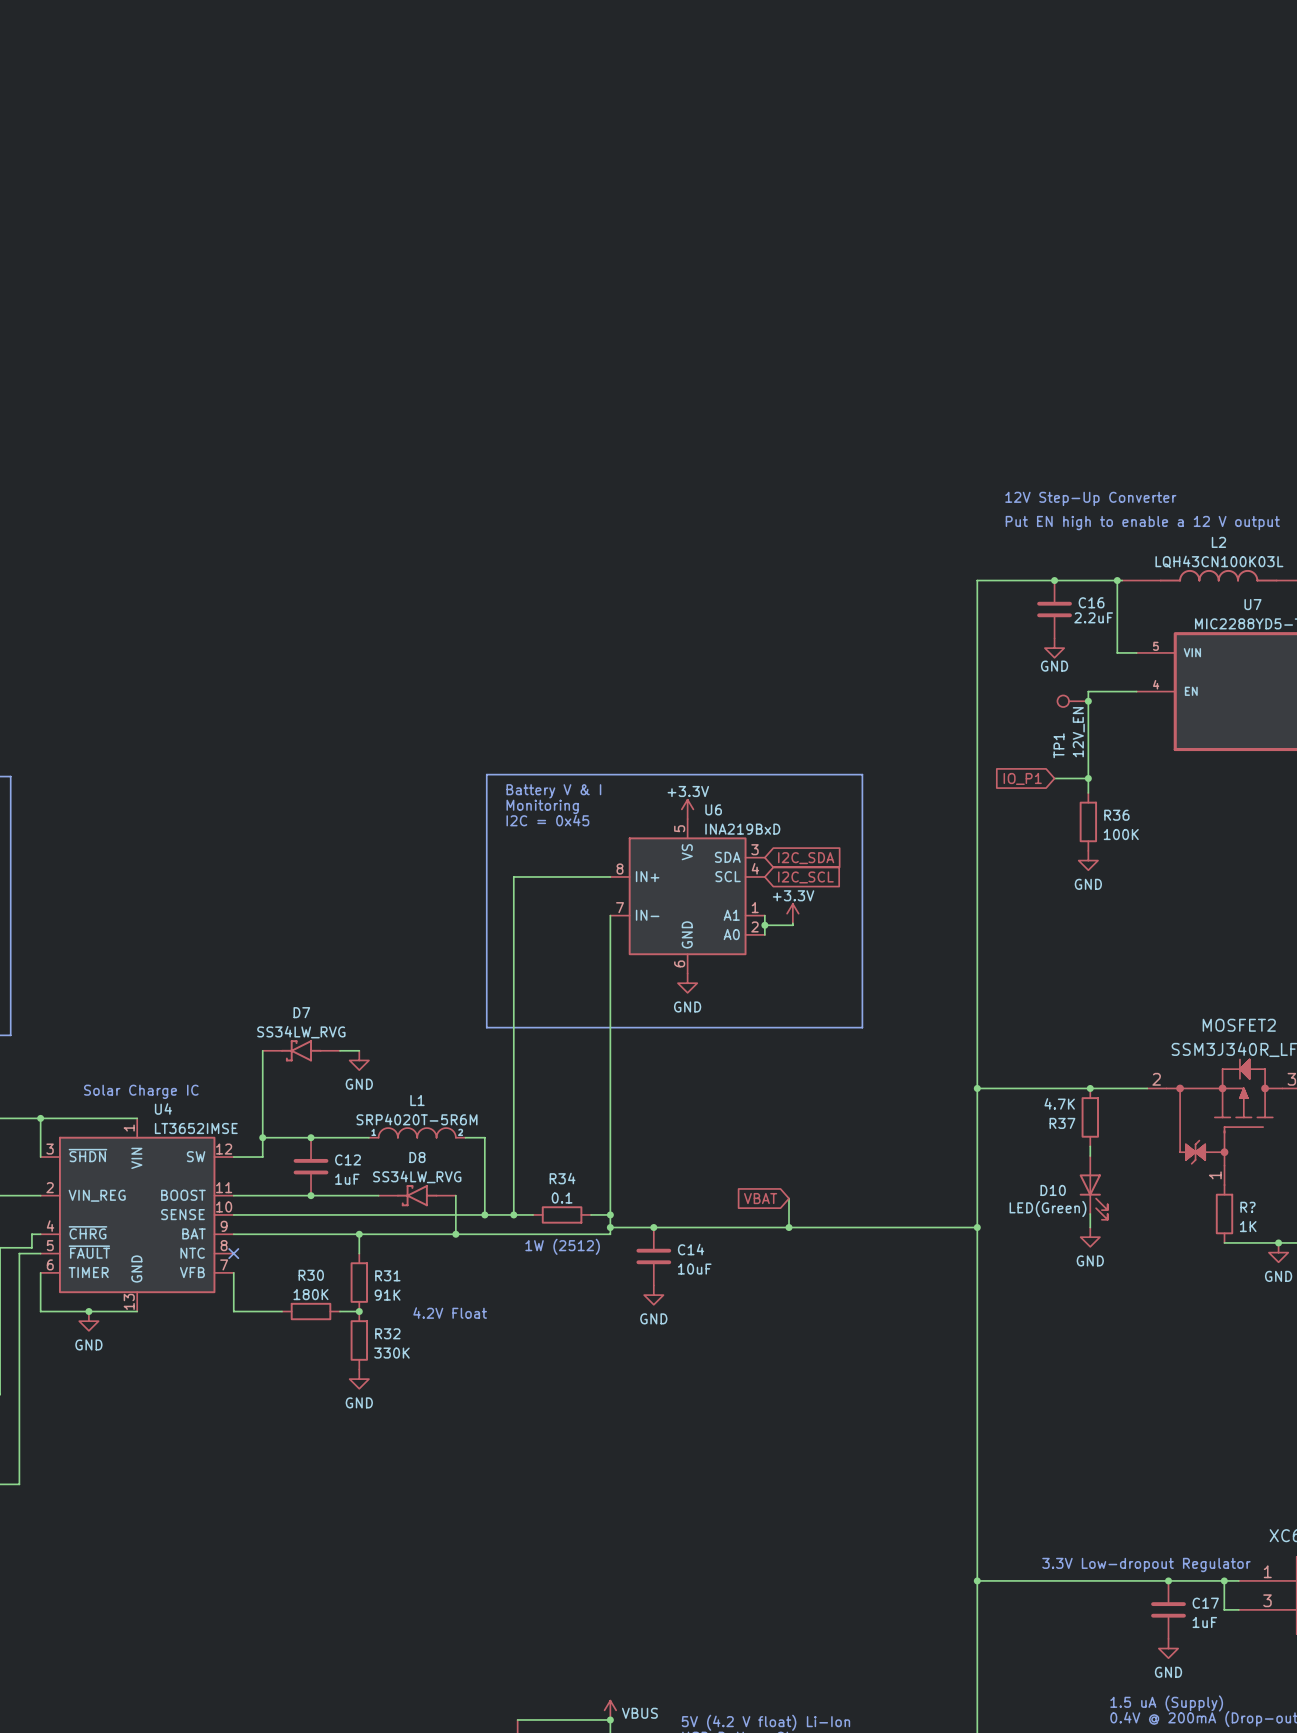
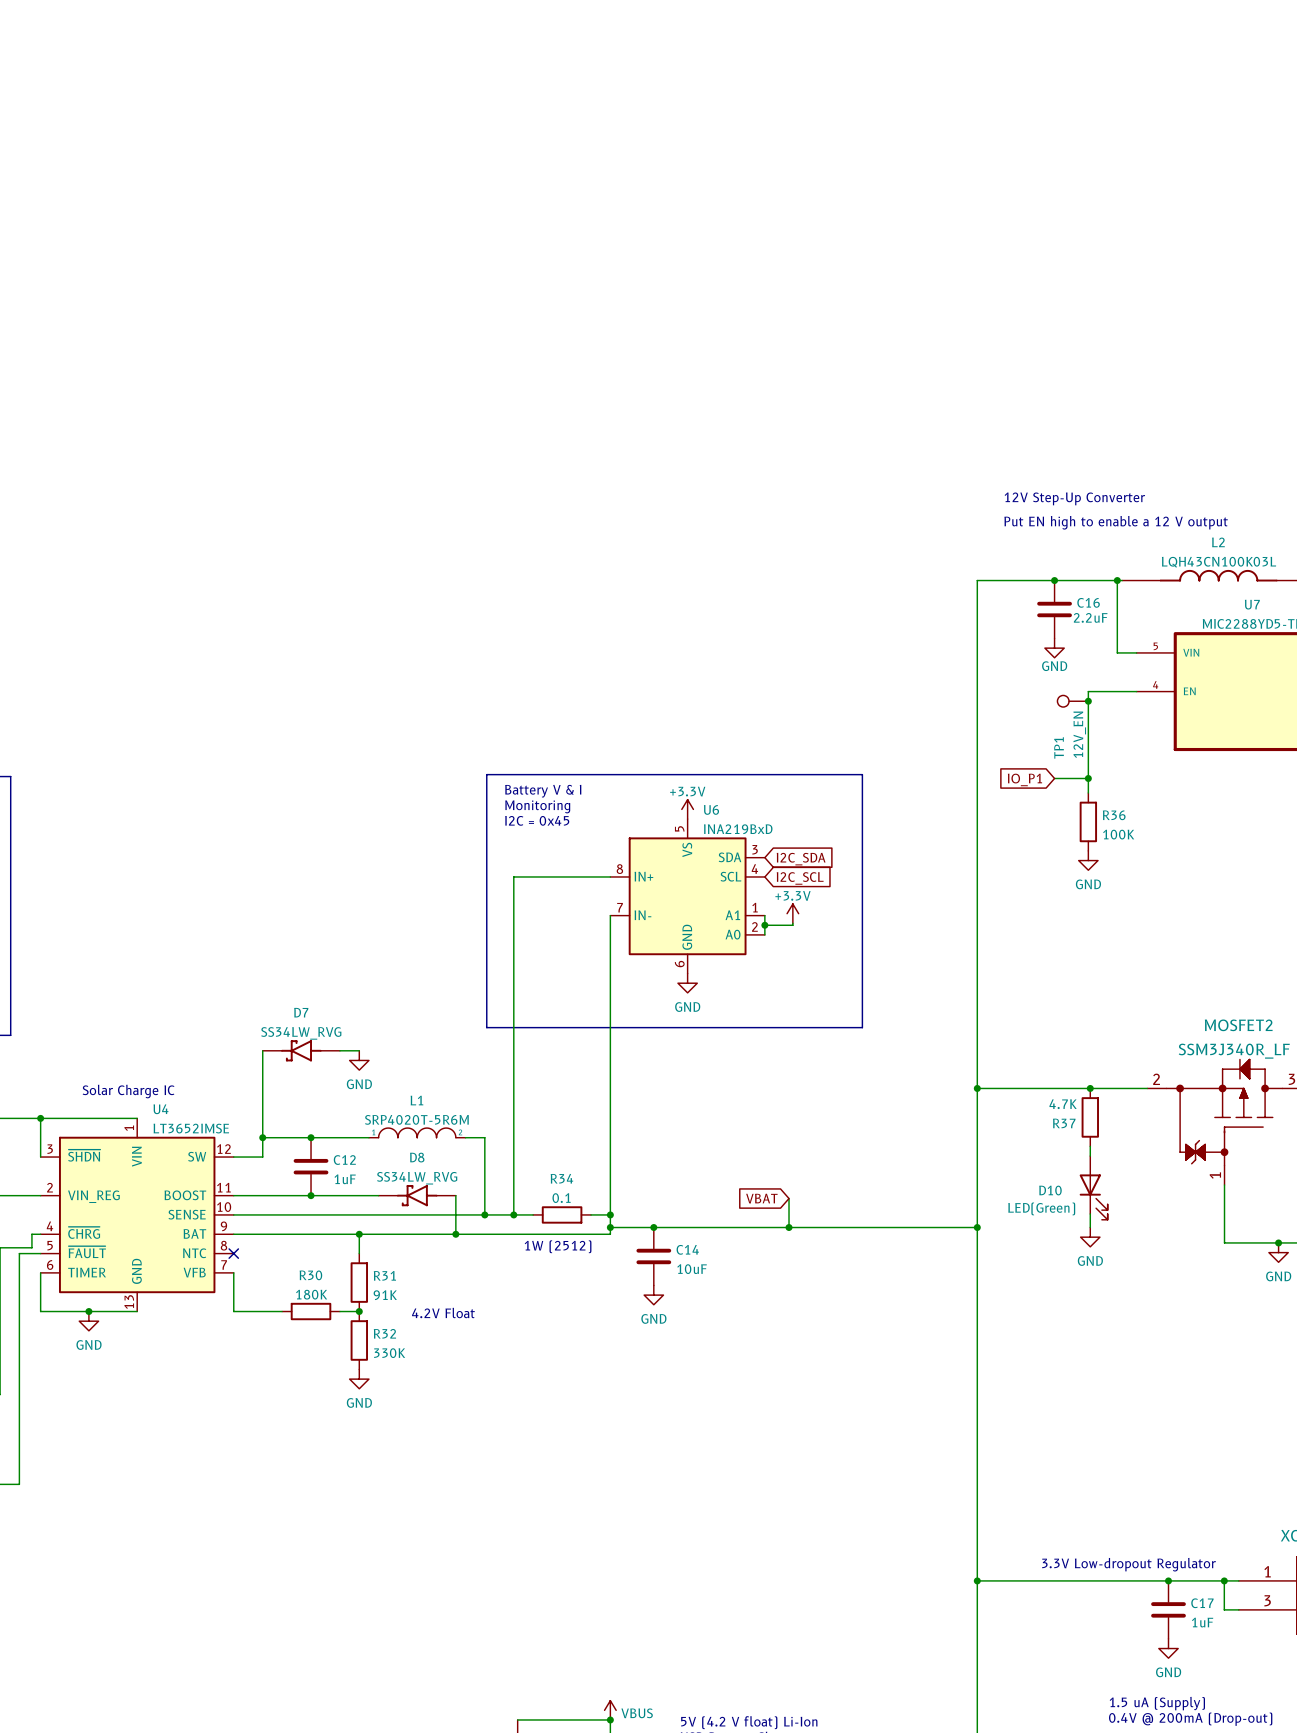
wire: none -> (1224, 1185) (1224, 1242)
R?: 1K (1224, 1213) -> none

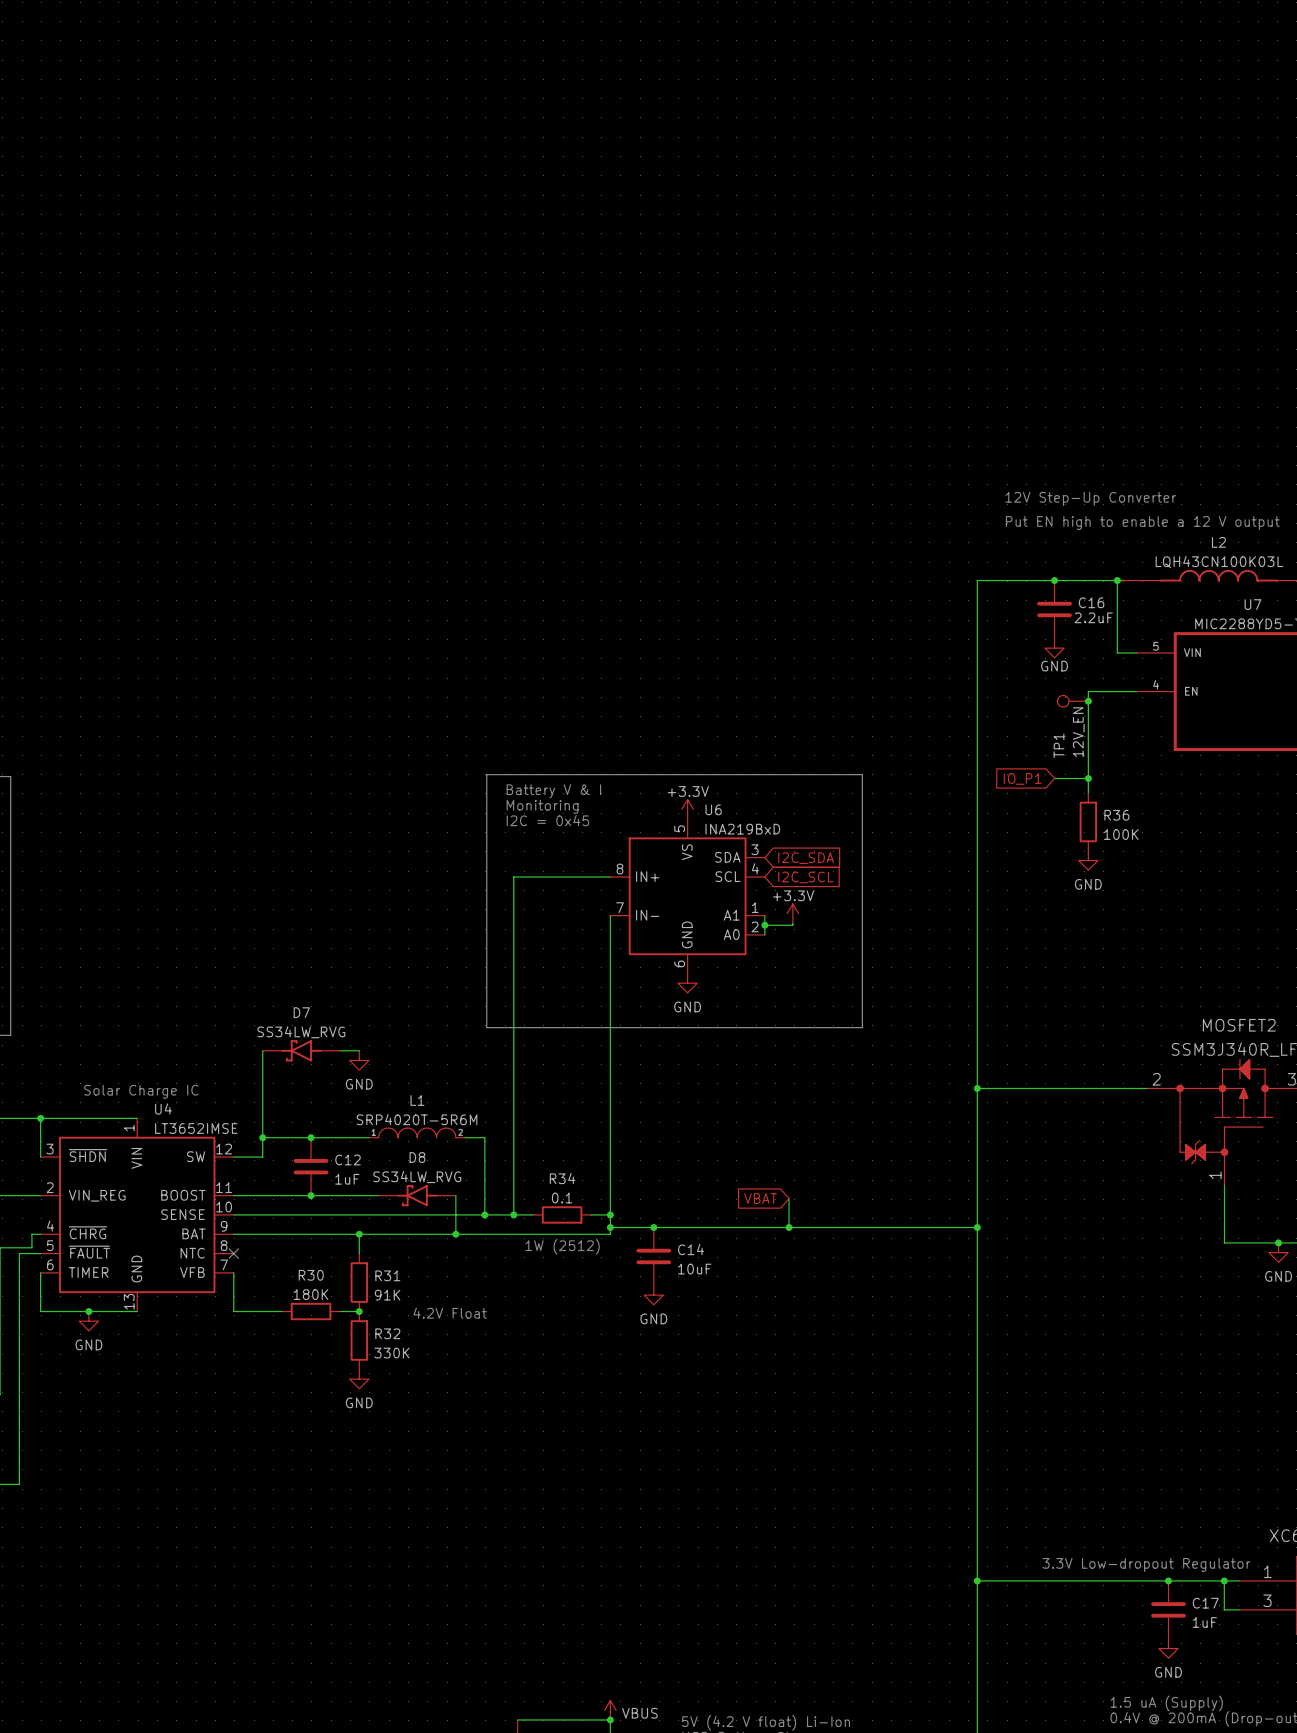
junction: (1090, 1088) -> none
R37: 4.7K (1090, 1117) -> none
wire: (1090, 1146) (1090, 1156) -> none
D10: LED(Green) (1093, 1187) -> none
wire: (1090, 1213) (1090, 1227) -> none
power symbol: GND (1090, 1237) -> none

